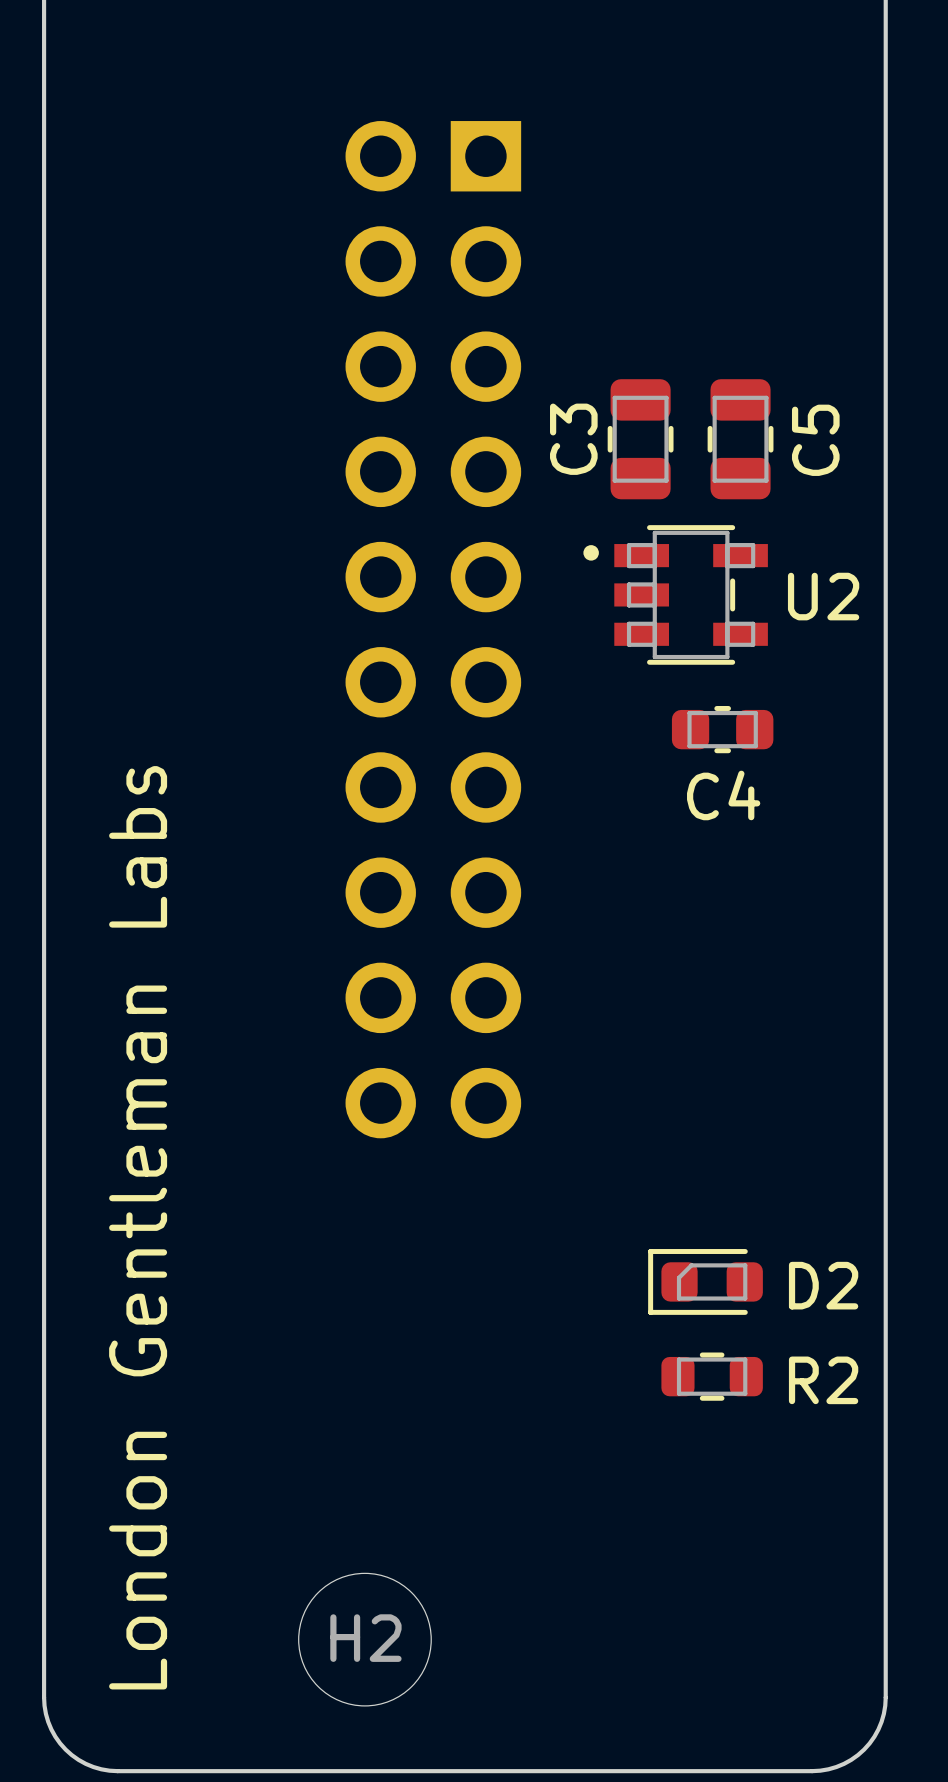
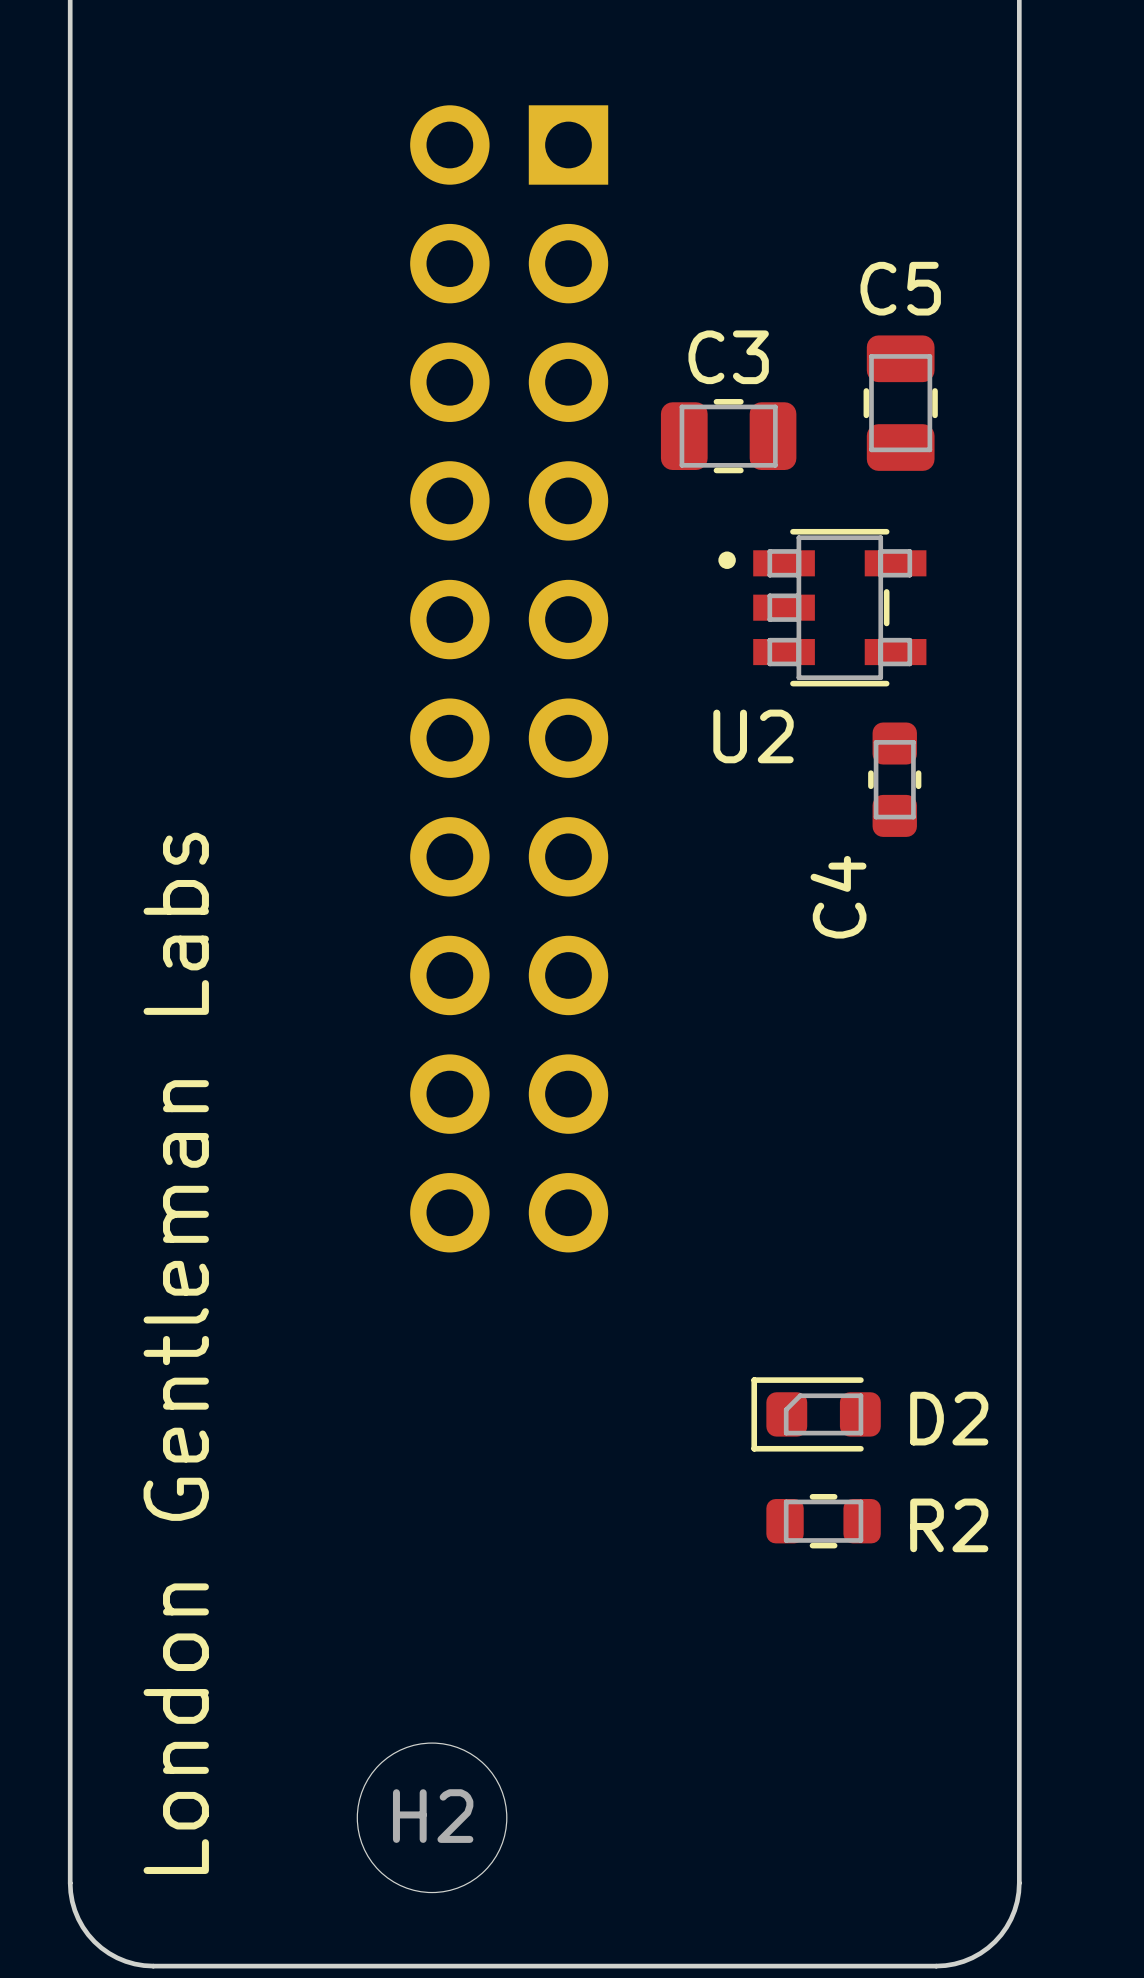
C3 rotation: 0° (640, 439) -> 90° clockwise (728, 436)
C5 position: (740, 439) -> (900, 403)
C5 name rotation: 0° (815, 440) -> 90° clockwise (900, 288)
C5 name position: C5 (815, 440) -> C5 (900, 288)
U2 position: (675, 594) -> (822, 607)
U2 name position: U2 (823, 596) -> U2 (753, 736)
C4 rotation: 0° (722, 729) -> 90° clockwise (894, 779)

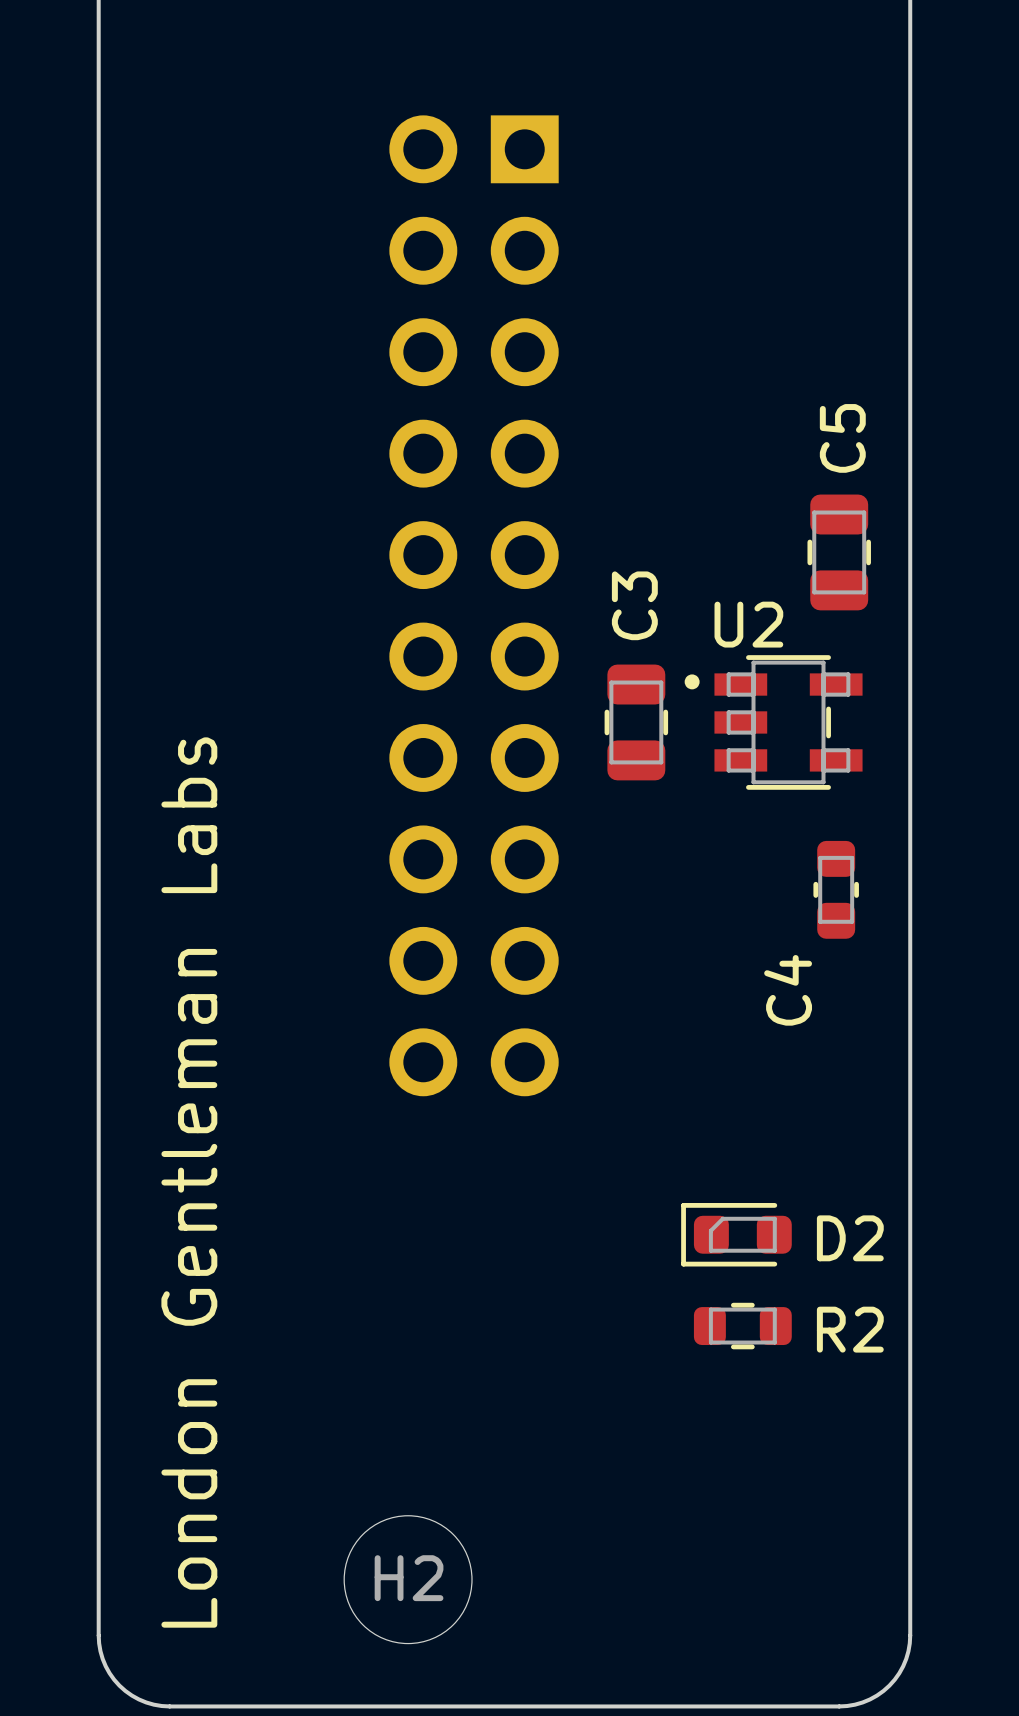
C5 name rotation: 0° (900, 288) -> 90° counterclockwise (842, 438)
C5 position: (900, 403) -> (839, 552)
C3 rotation: 0° (728, 436) -> 90° clockwise (636, 722)
C3 position: (728, 436) -> (636, 722)
U2 position: (822, 607) -> (773, 722)
U2 name position: U2 (753, 736) -> U2 (748, 624)
C4 position: (894, 779) -> (836, 889)

